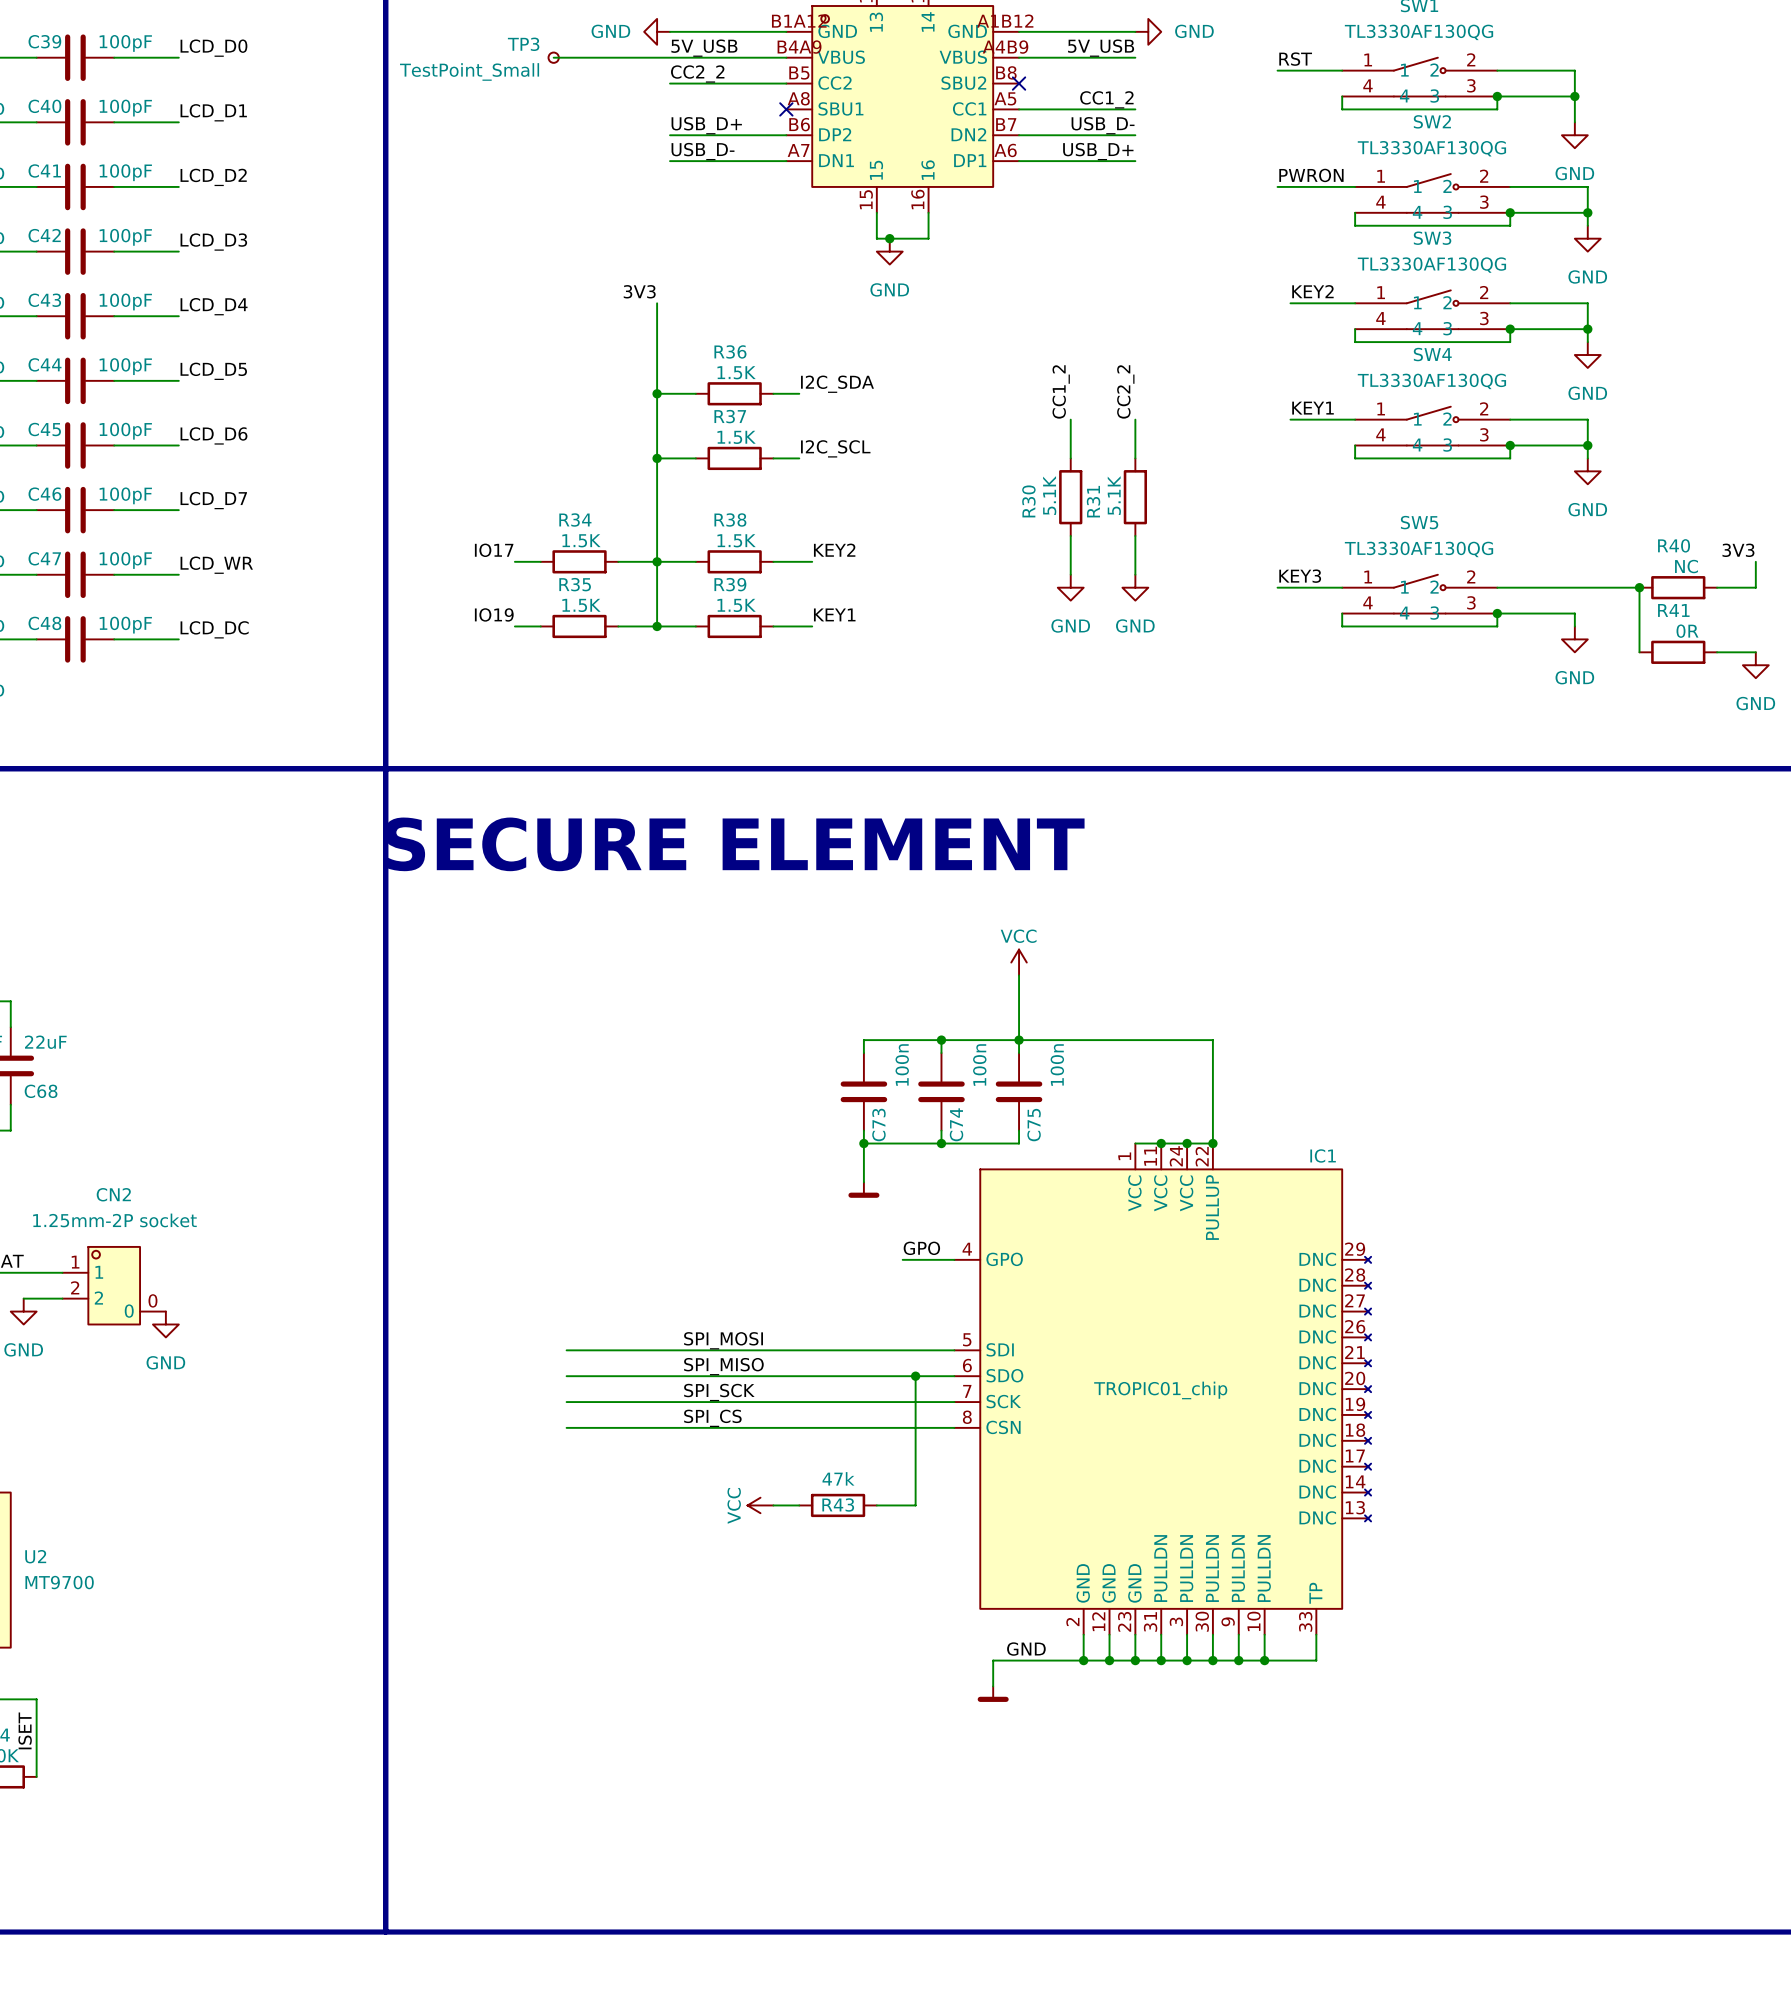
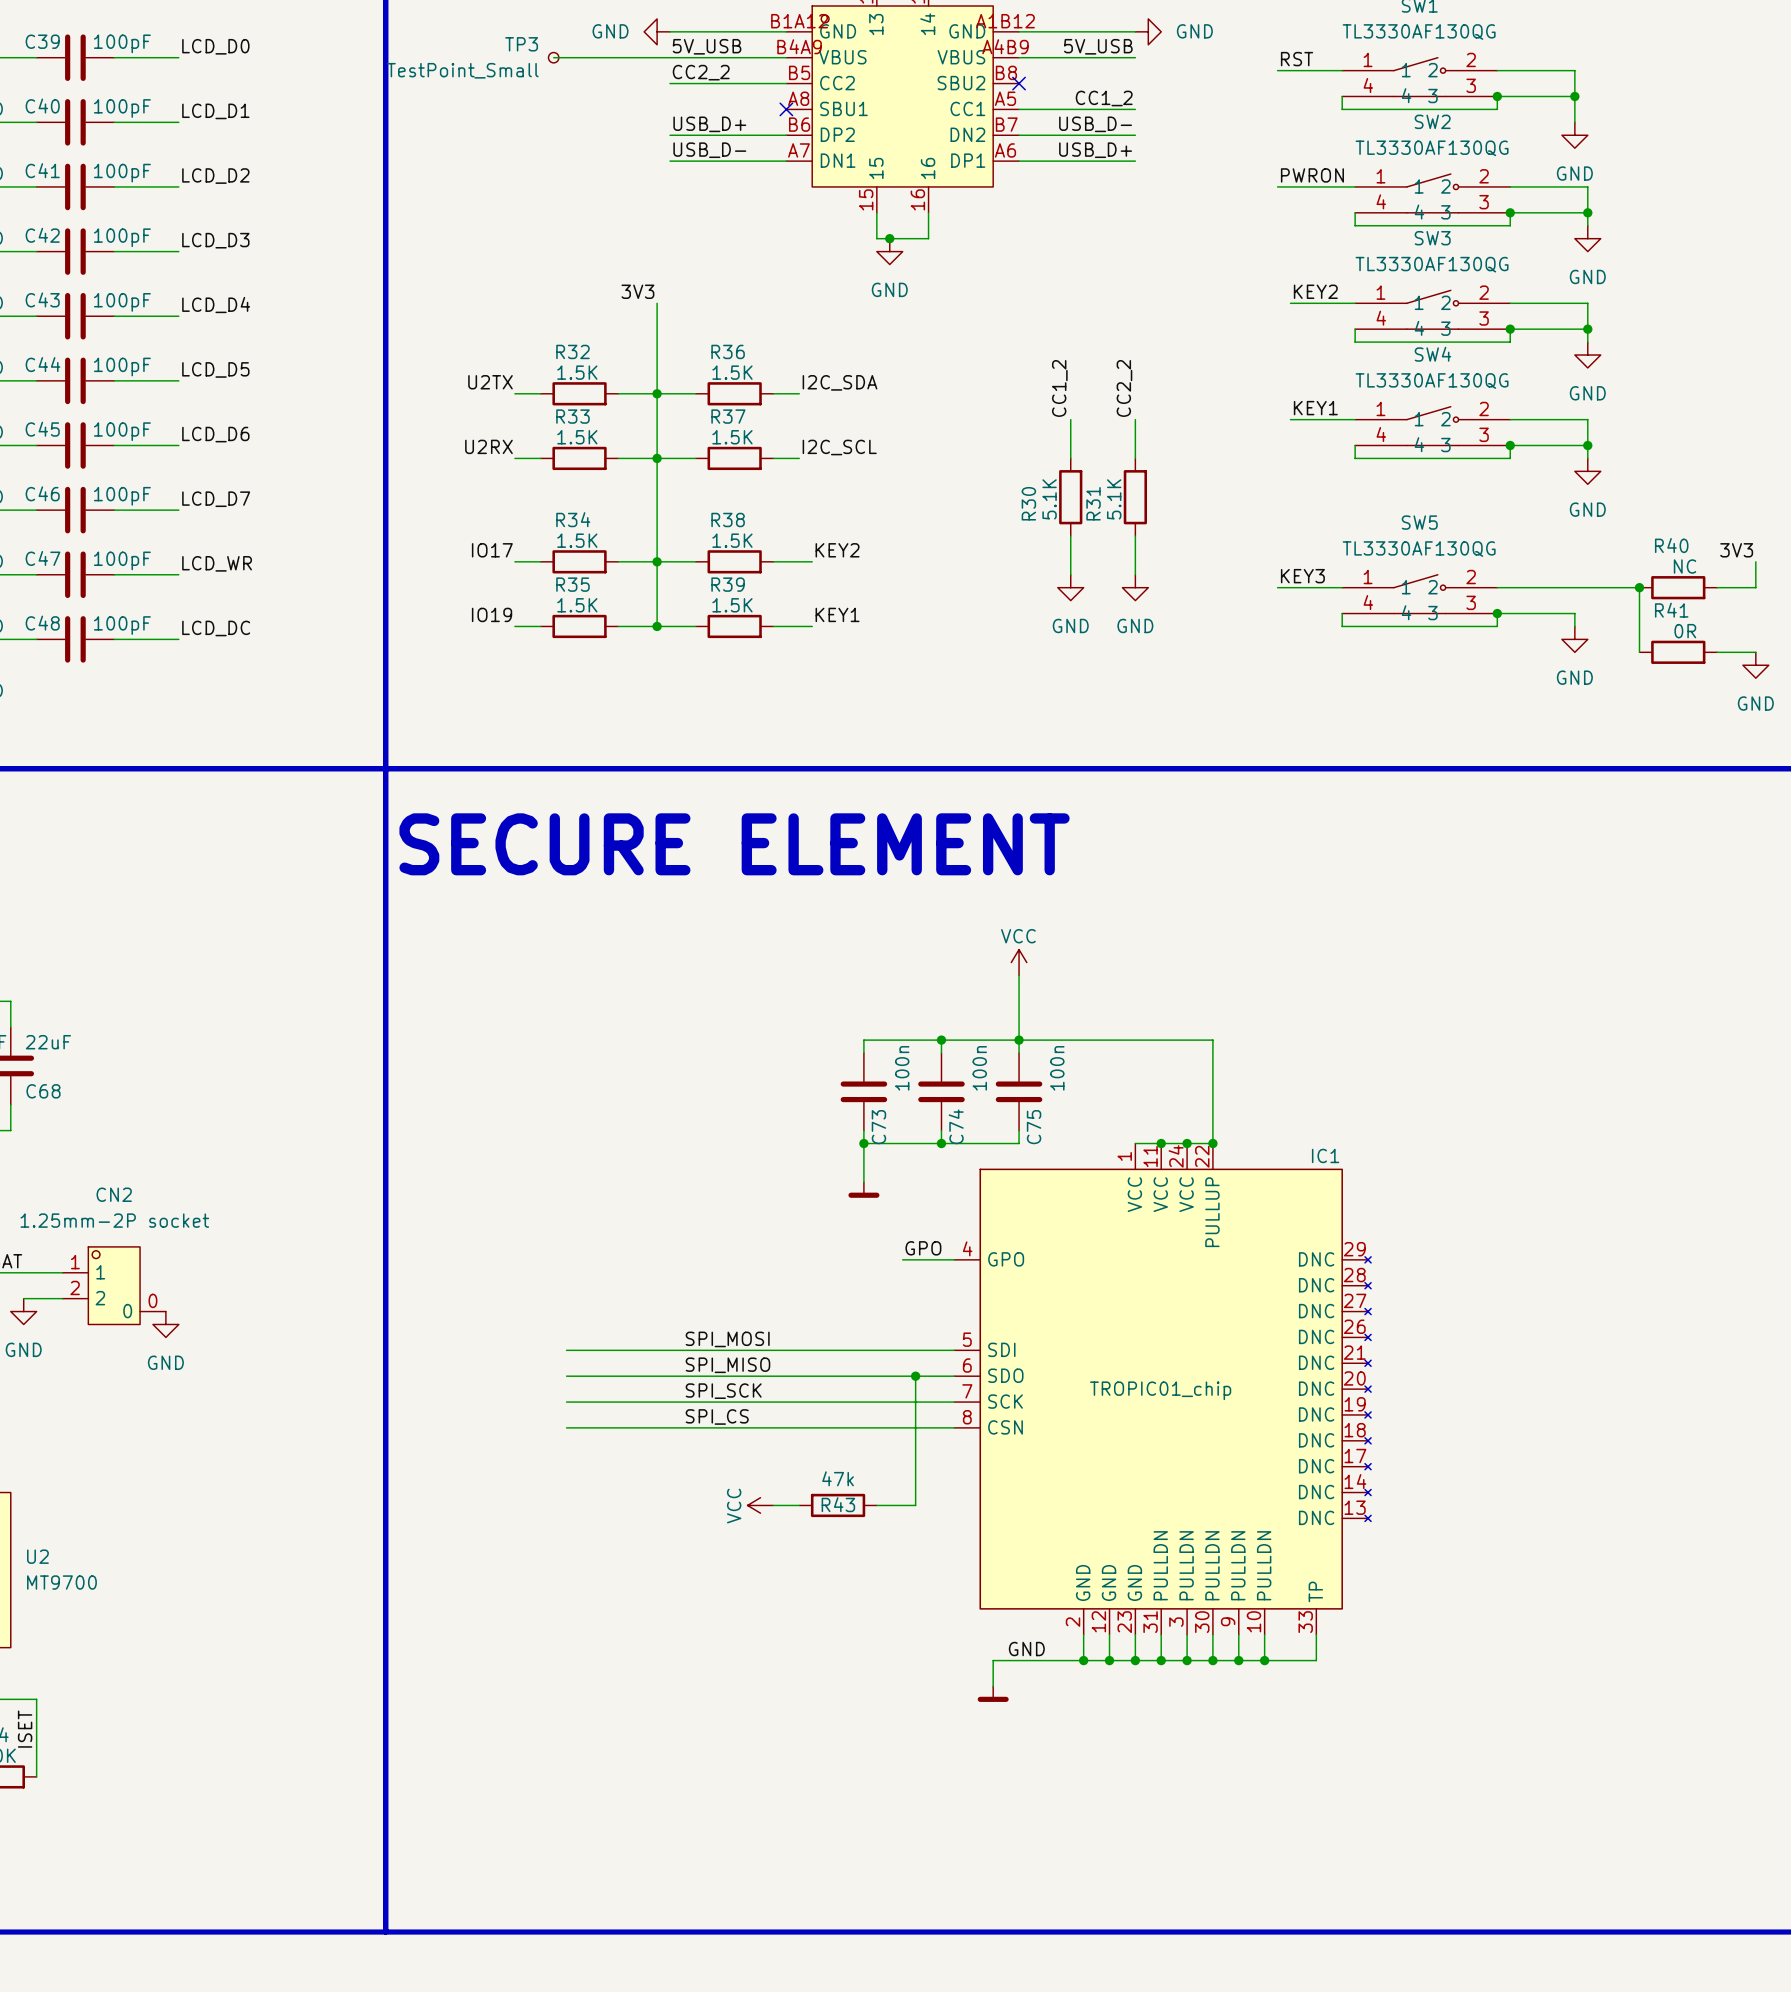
label: none -> U2TX (490, 382)
wire: none -> (514, 393) (540, 393)
R32: none -> 1.5K (579, 393)
wire: none -> (618, 393) (657, 393)
label: none -> U2RX (488, 446)
wire: none -> (514, 458) (540, 458)
R33: none -> 1.5K (579, 458)
wire: none -> (618, 458) (657, 458)

